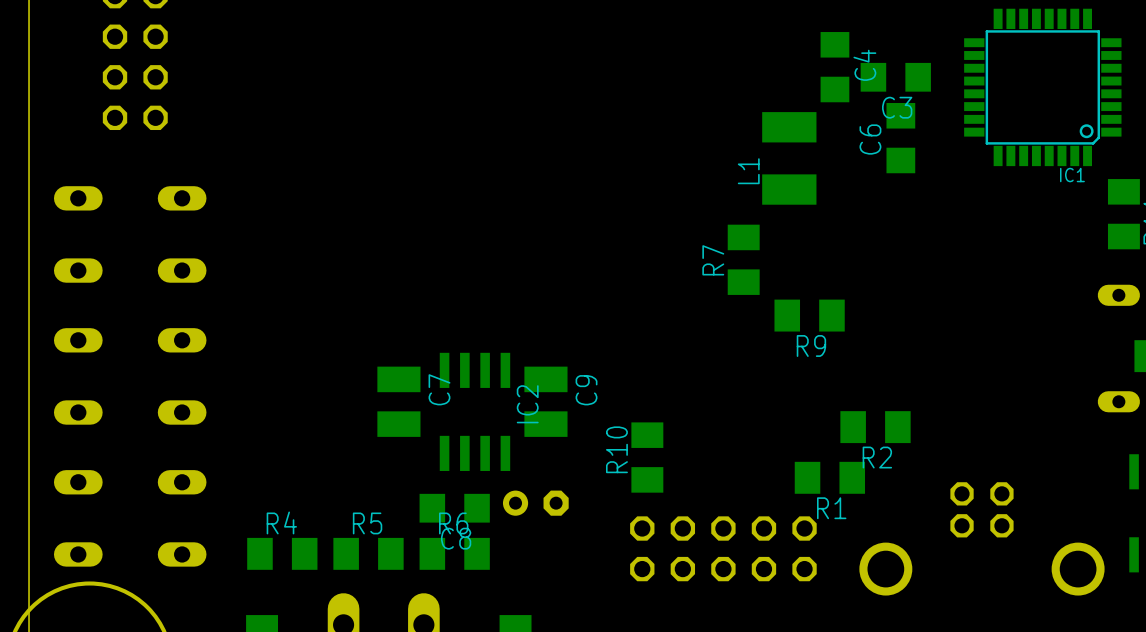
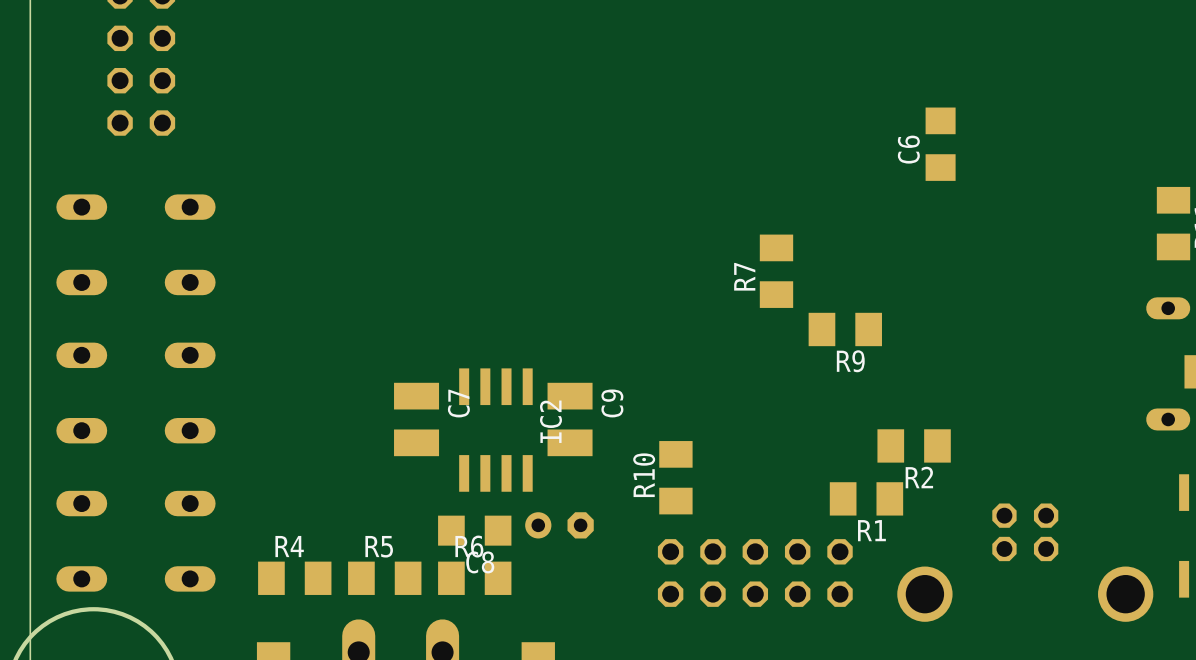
C4: (834, 67) -> none
C3: (895, 77) -> none
IC1: (1042, 87) -> none
L1: (789, 158) -> none

